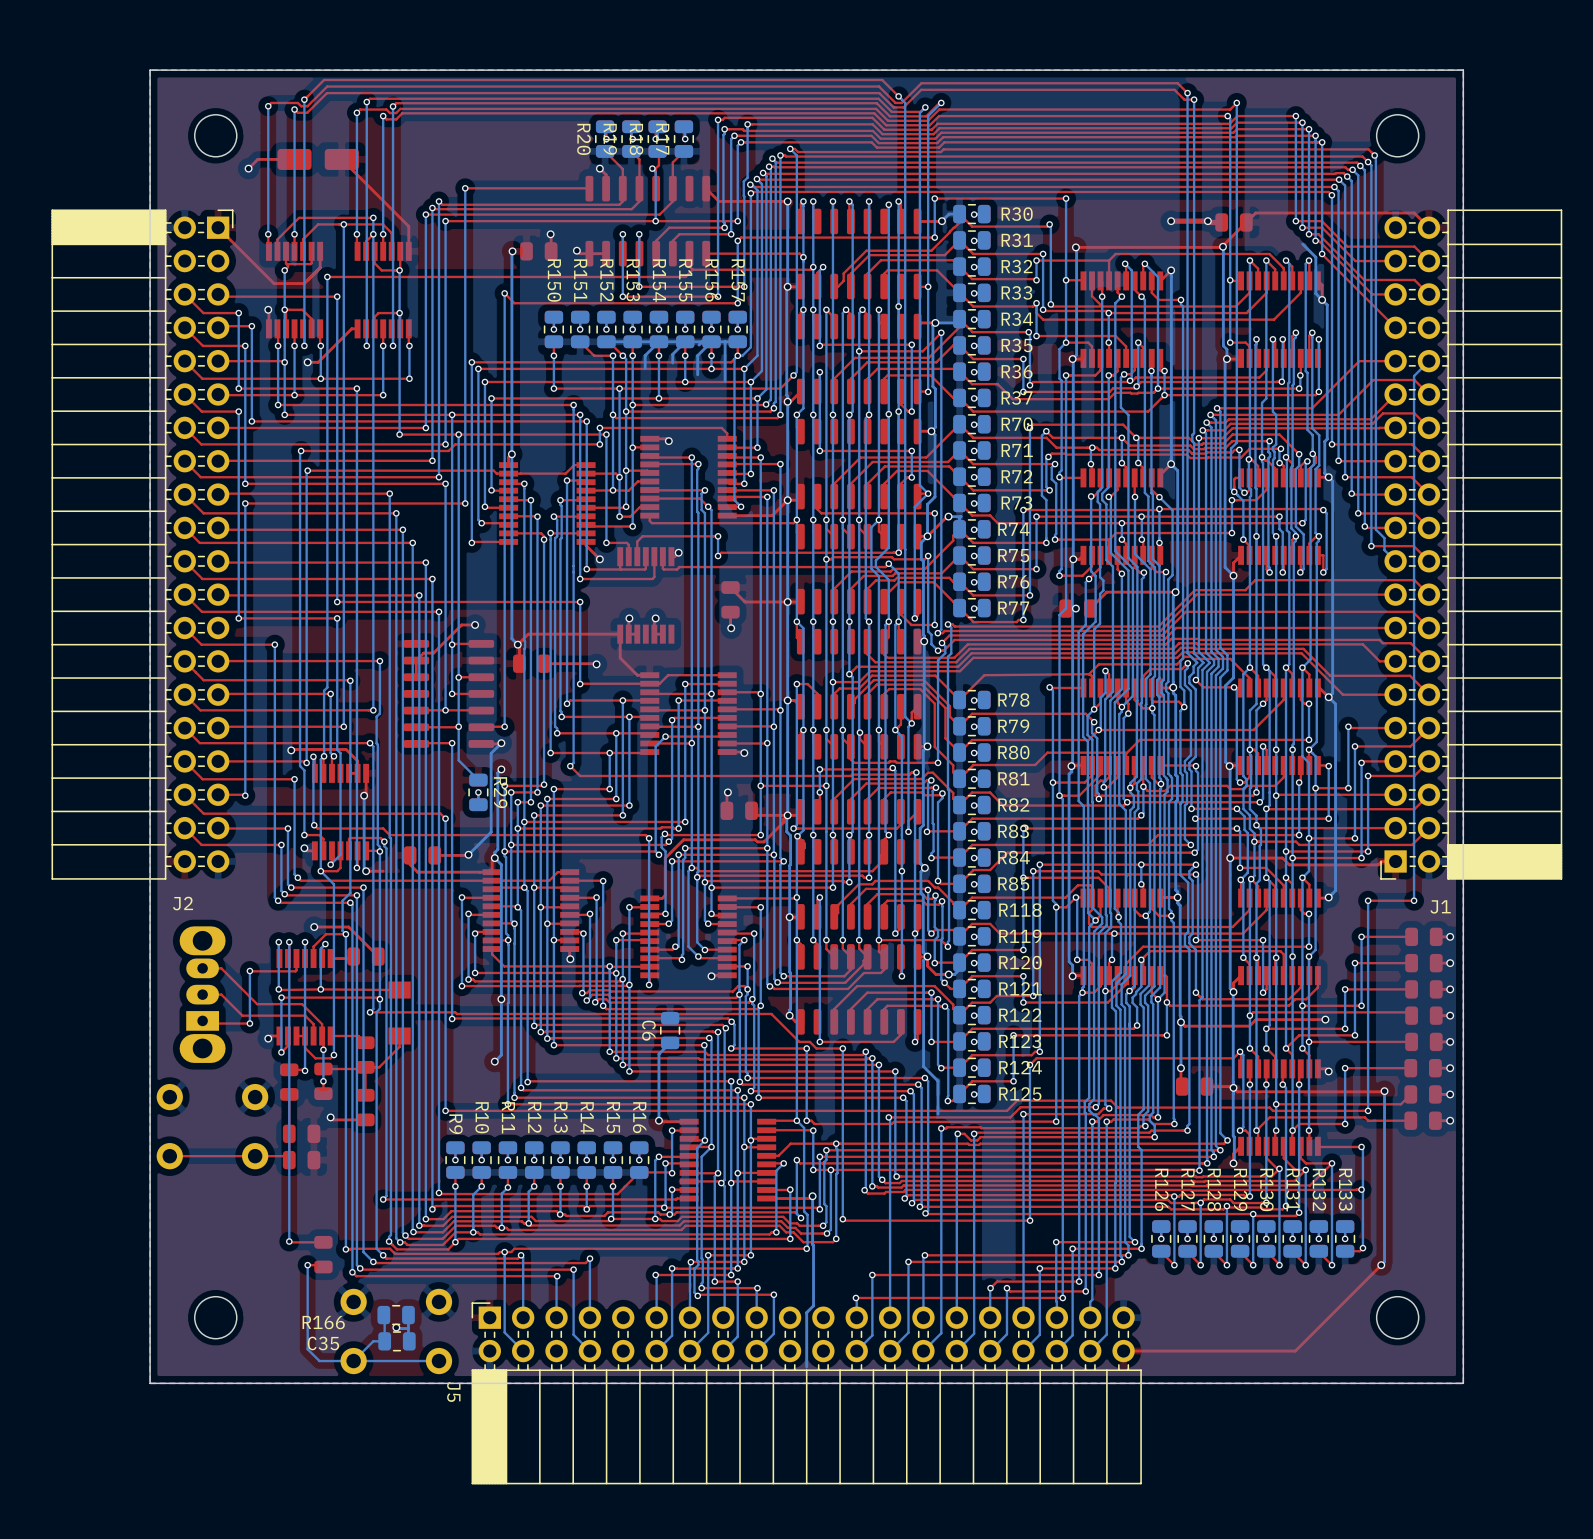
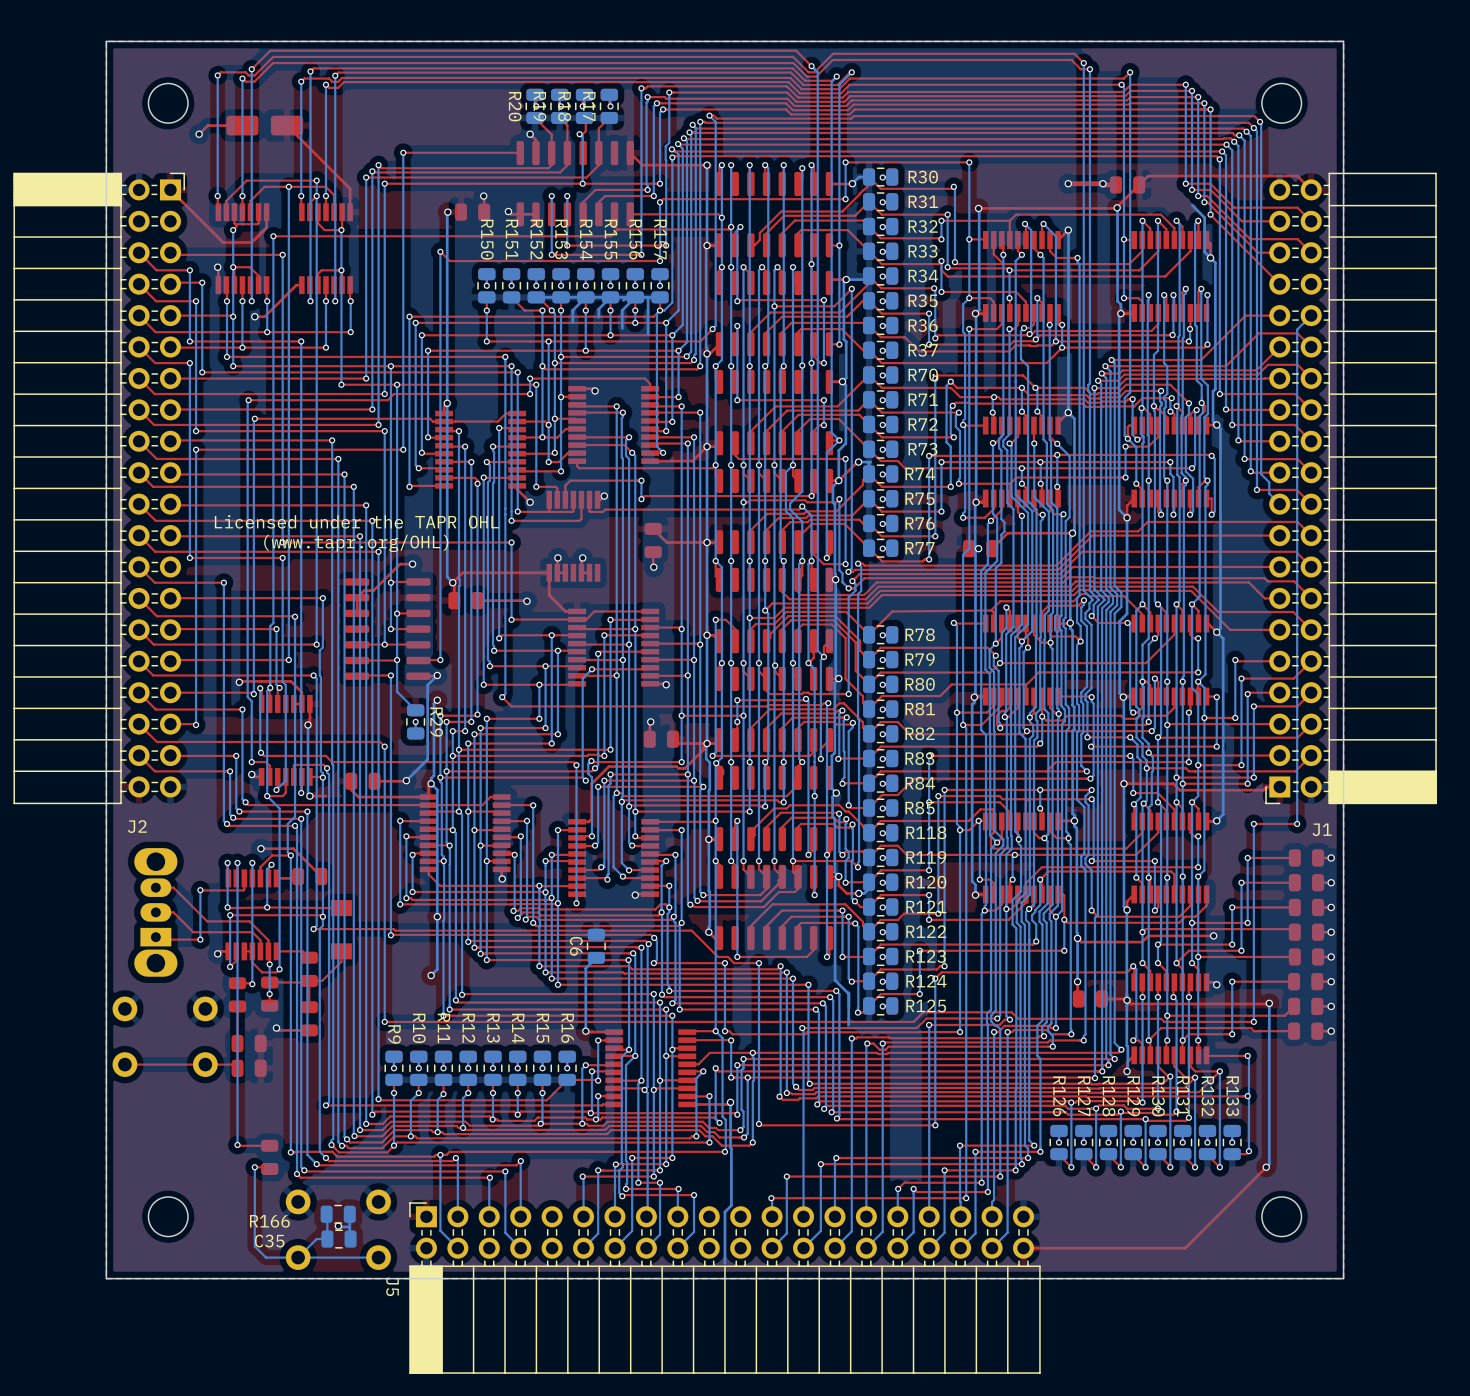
text: none -> Licensed under the TAPR OHL (356, 521)
text: none -> (www.tapr.org/OHL) (356, 543)

